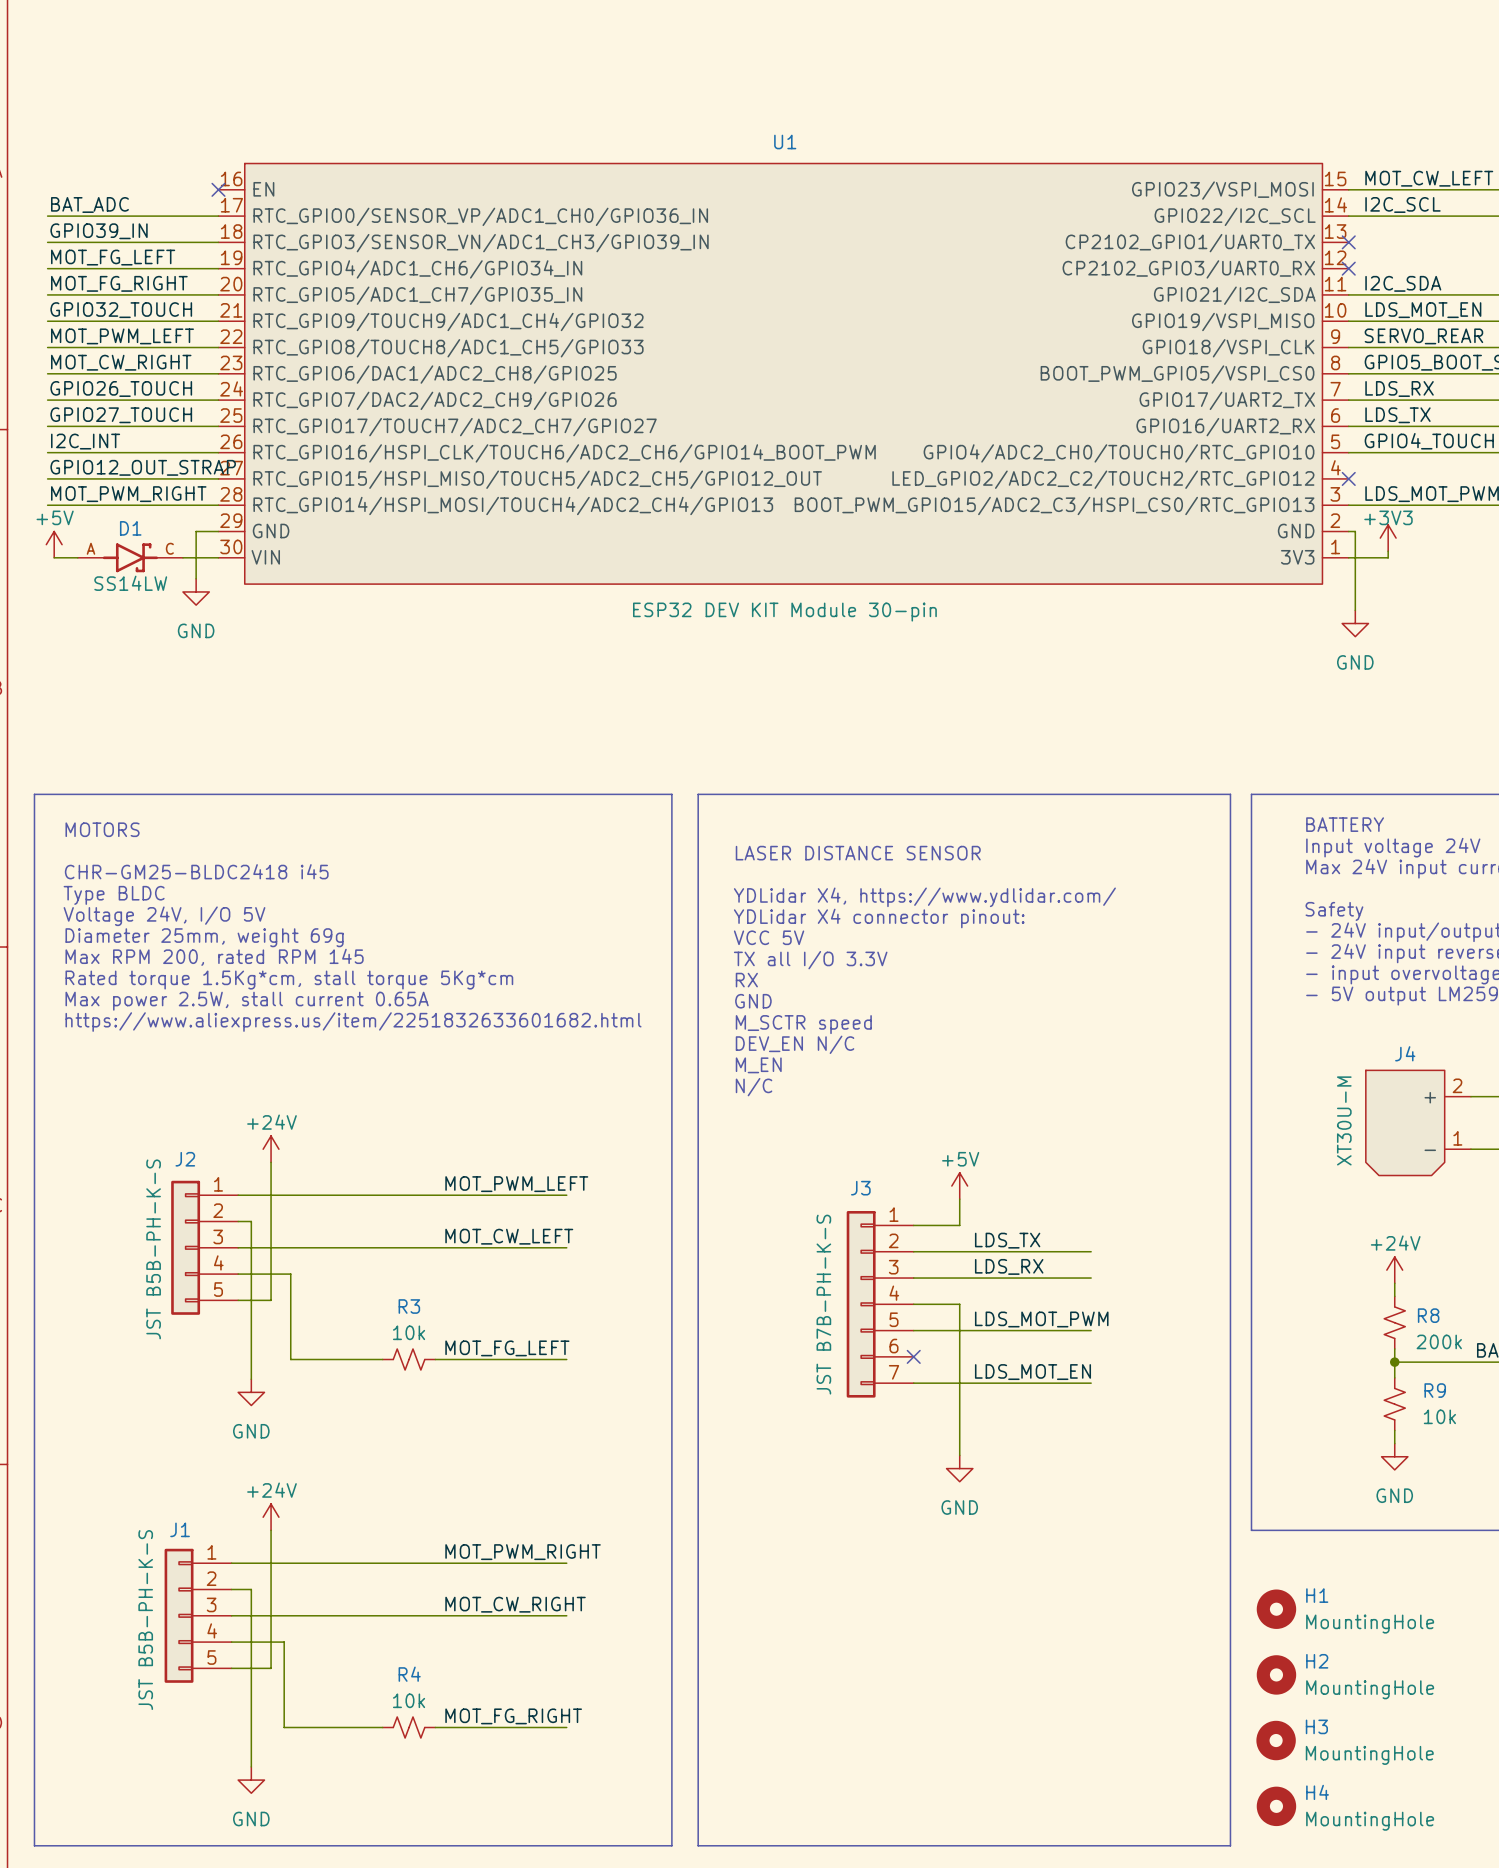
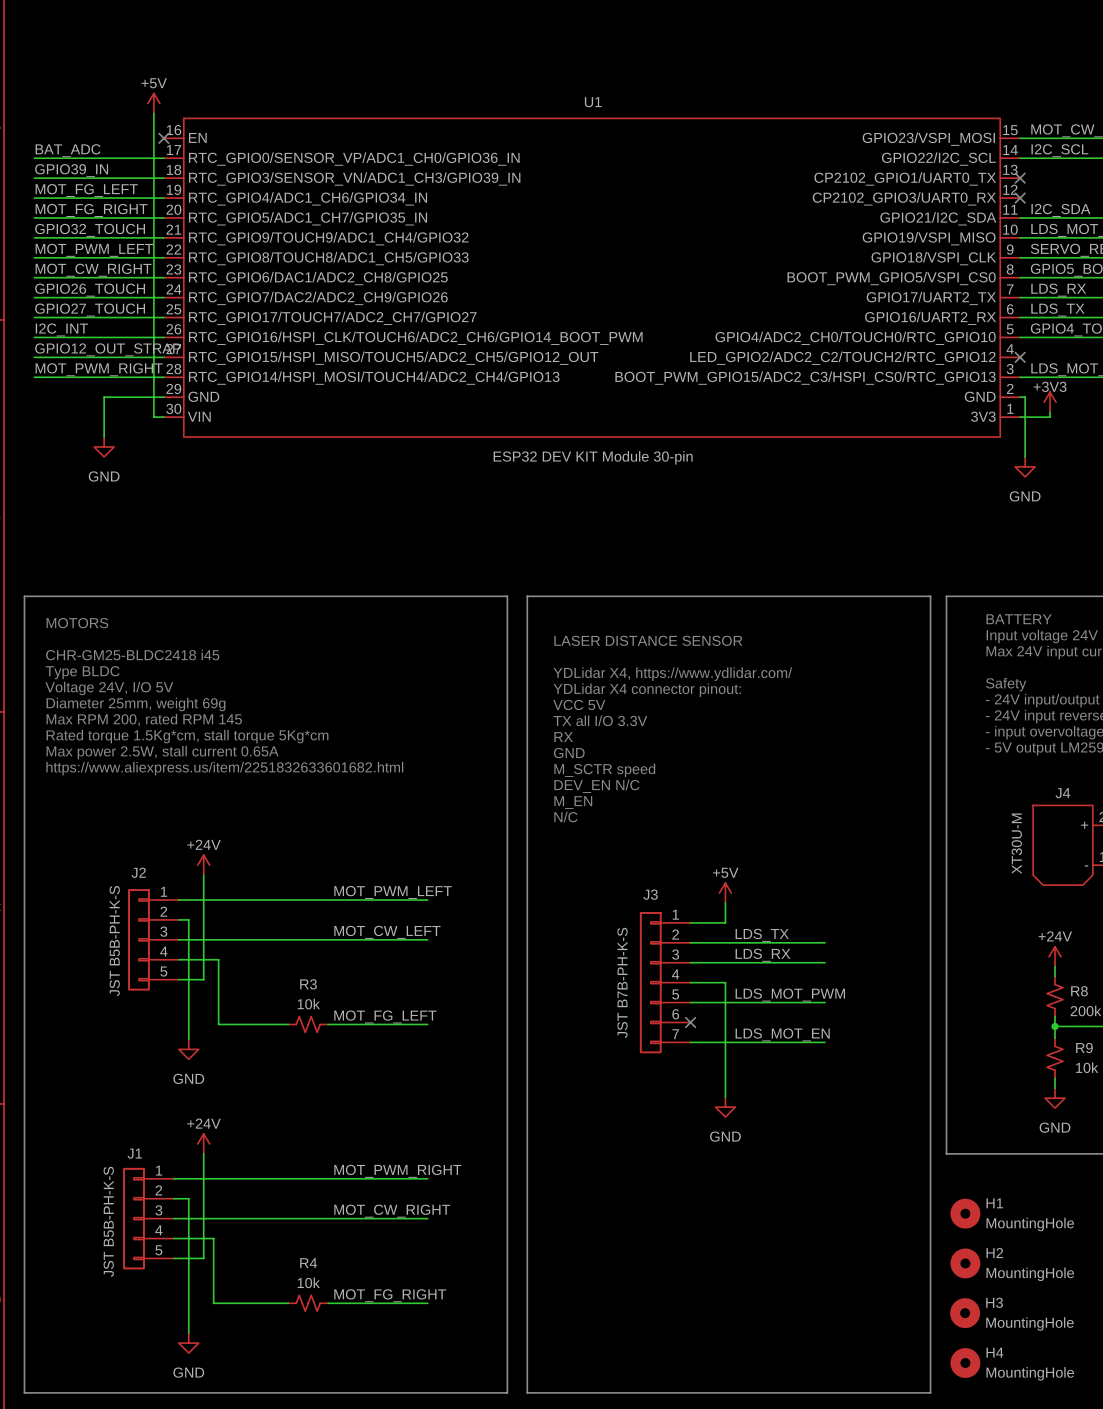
power symbol: none -> +5V (153, 103)
wire: (196, 531) (196, 578) -> (146, 397) (104, 397) (104, 437)
power symbol: +5V (54, 544) -> none
wire: (54, 557) (77, 557) -> none
D1: SS14LW (130, 557) -> none
wire: (182, 557) (205, 557) -> (153, 113) (153, 417)
power symbol position: GND (196, 591) -> GND (104, 446)

